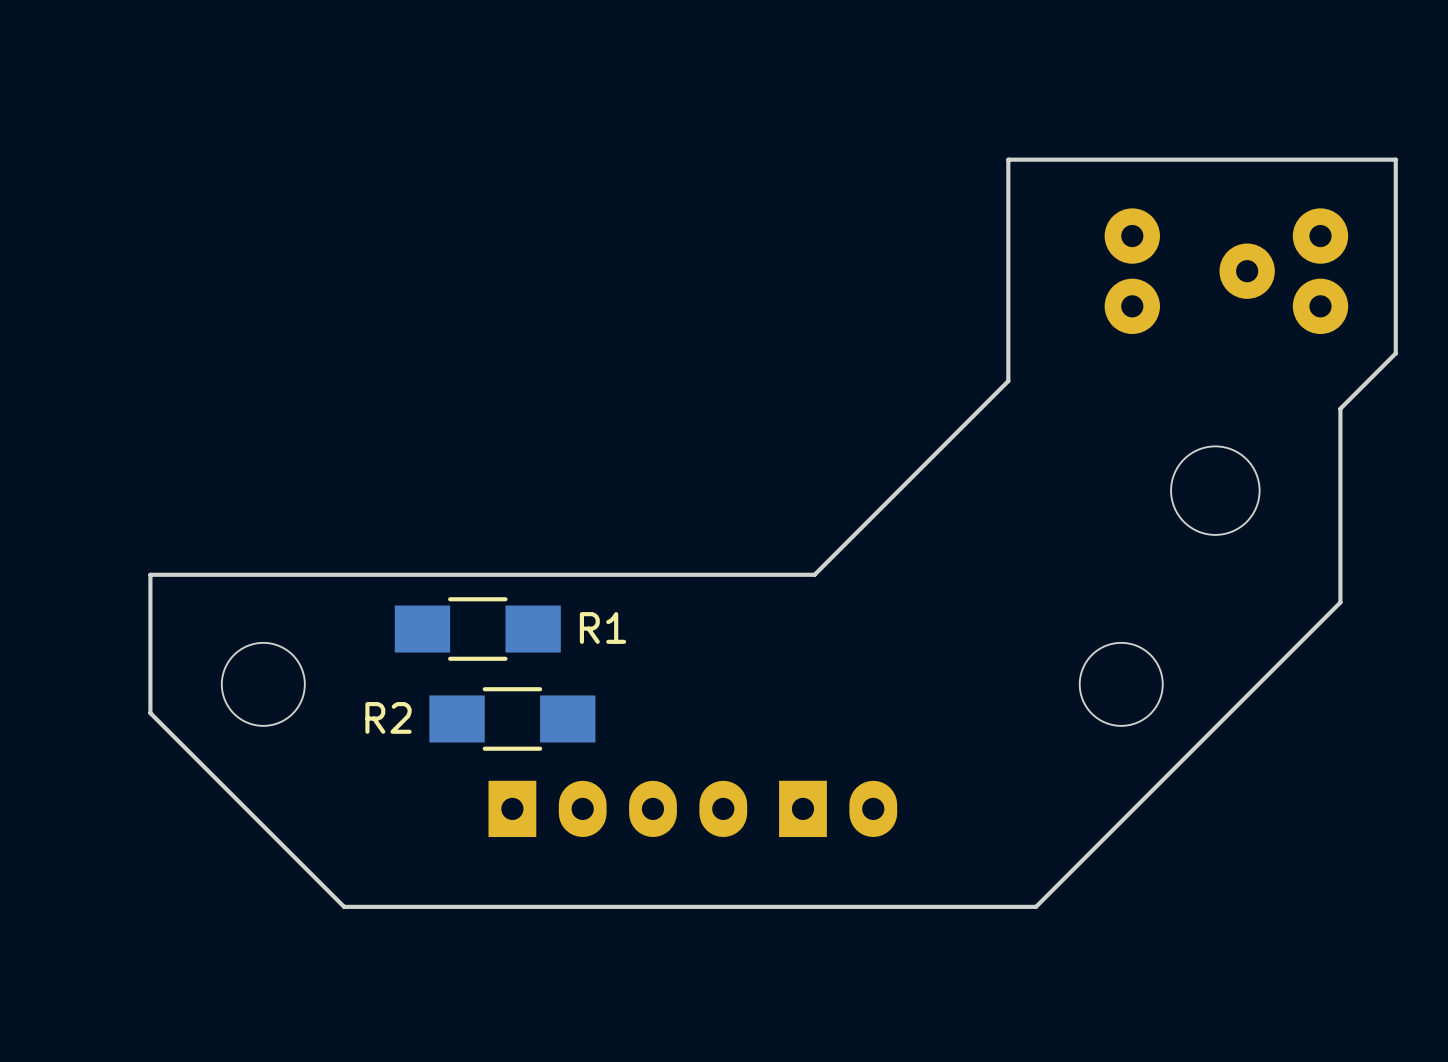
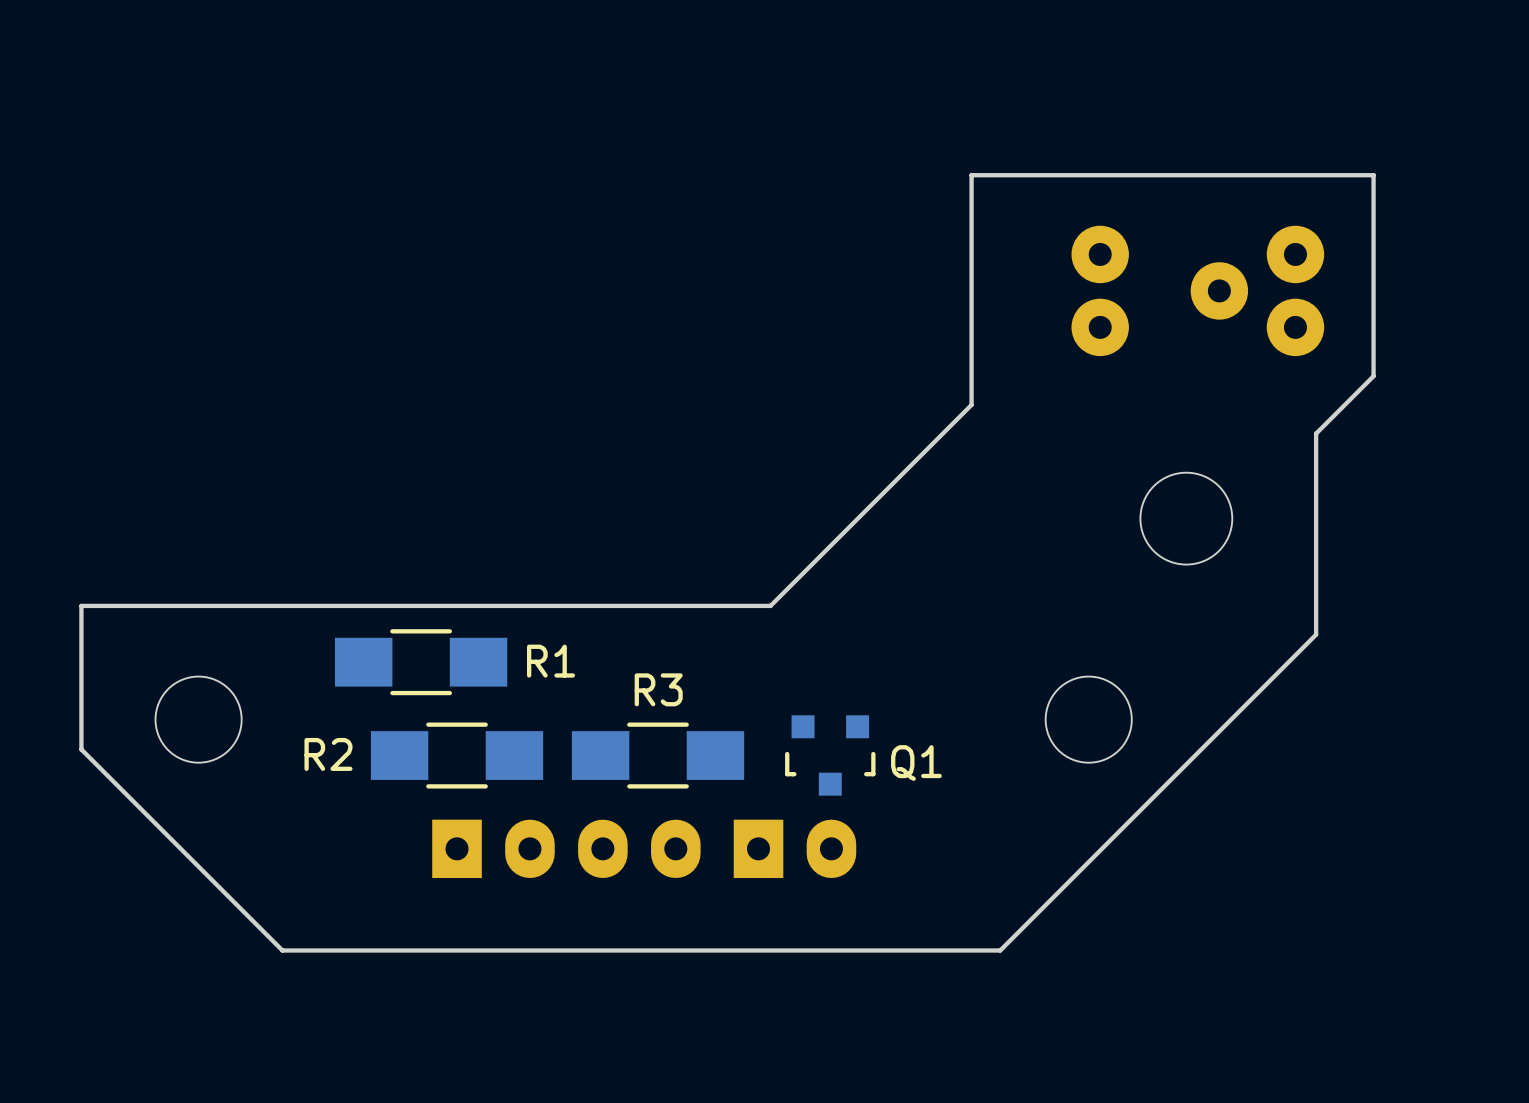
R3: none -> (658, 755)
Q1: none -> (830, 755)

